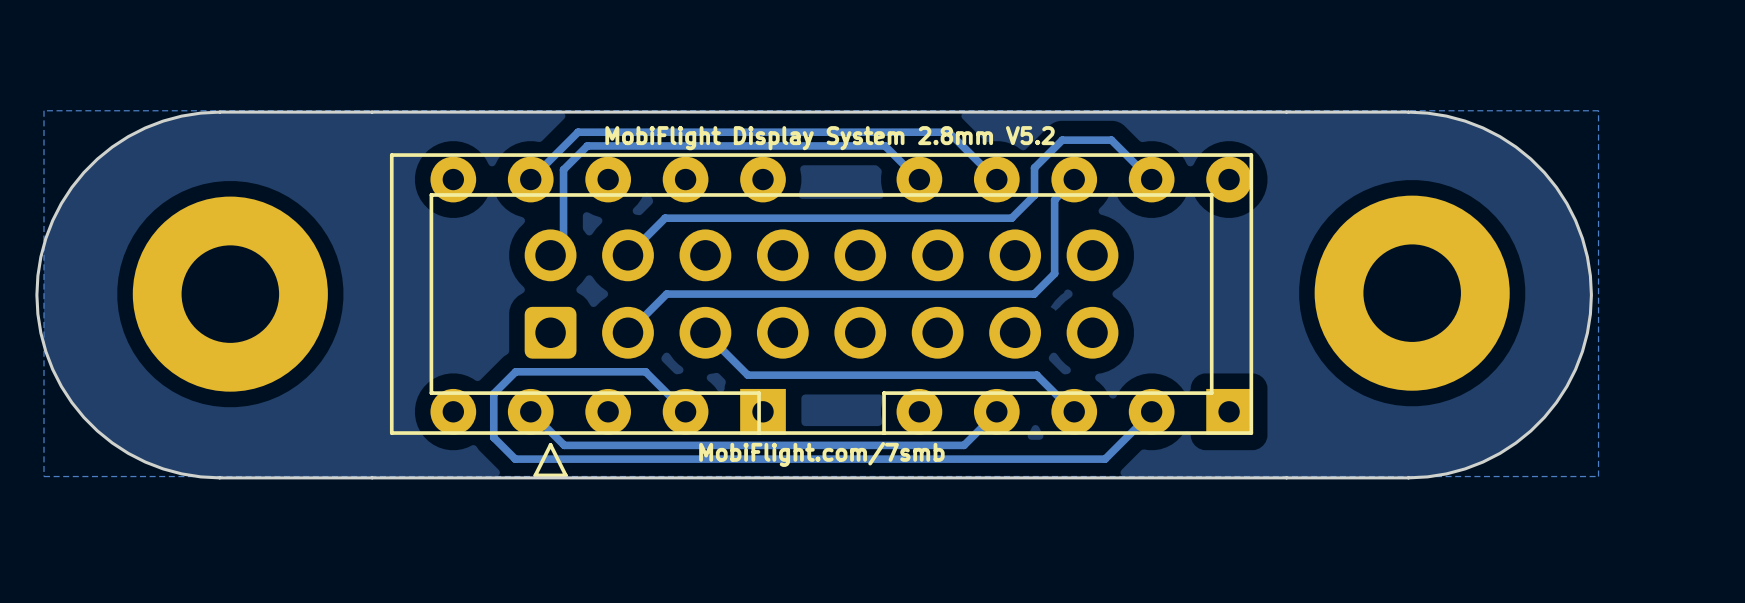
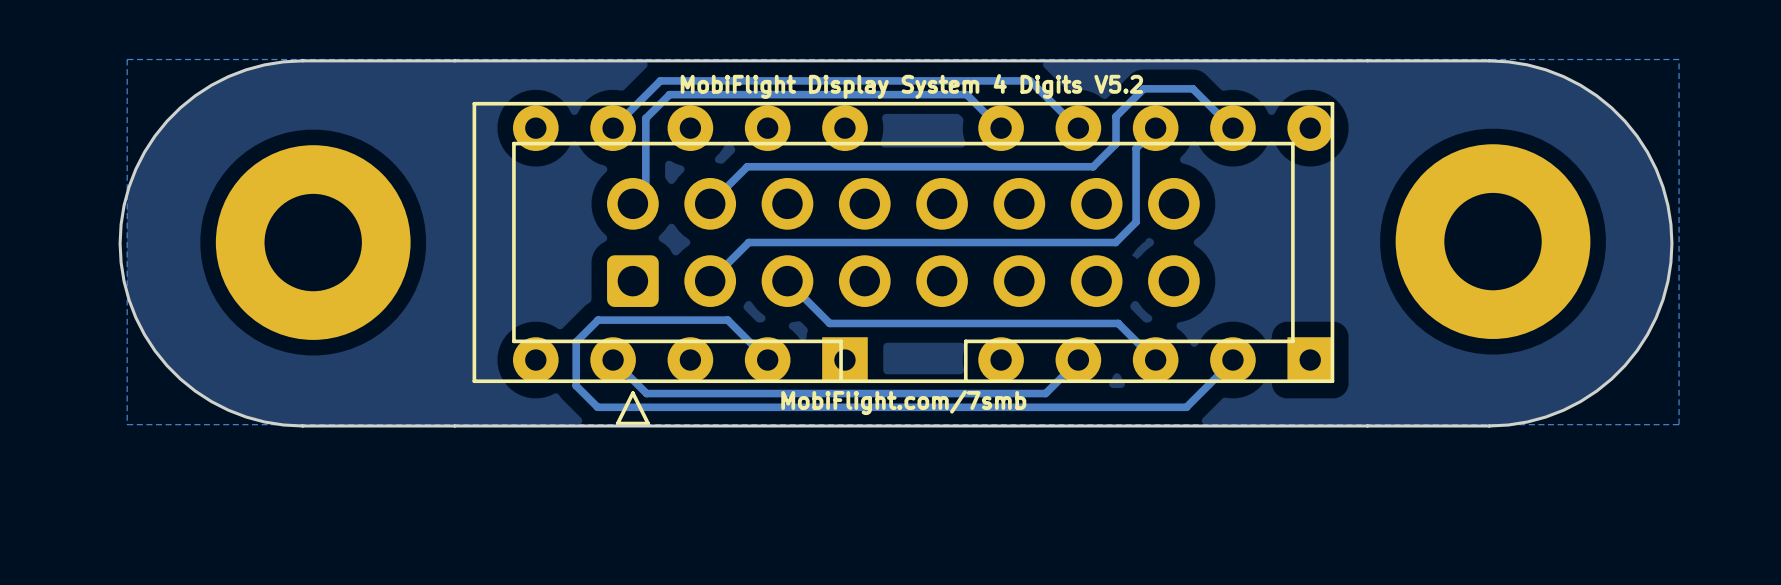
text: MobiFlight Display System 2.8mm V5.2 (830, 138) -> MobiFlight Display System 4 Digits V5.2 (911, 86)

